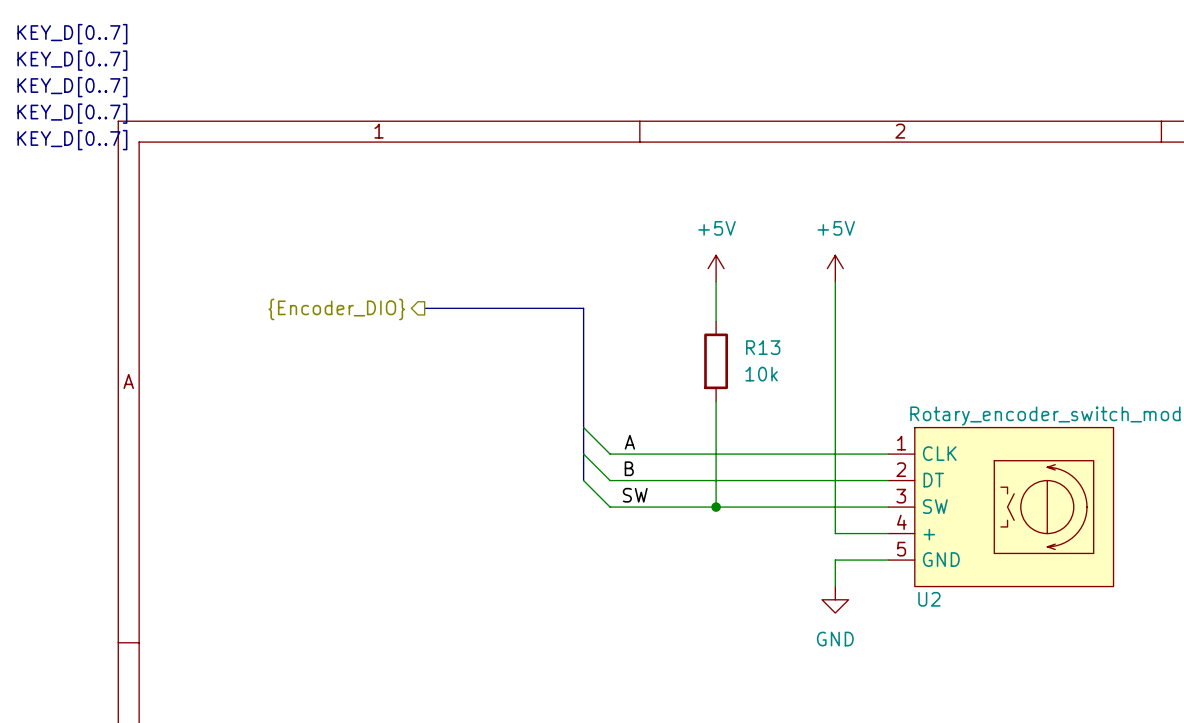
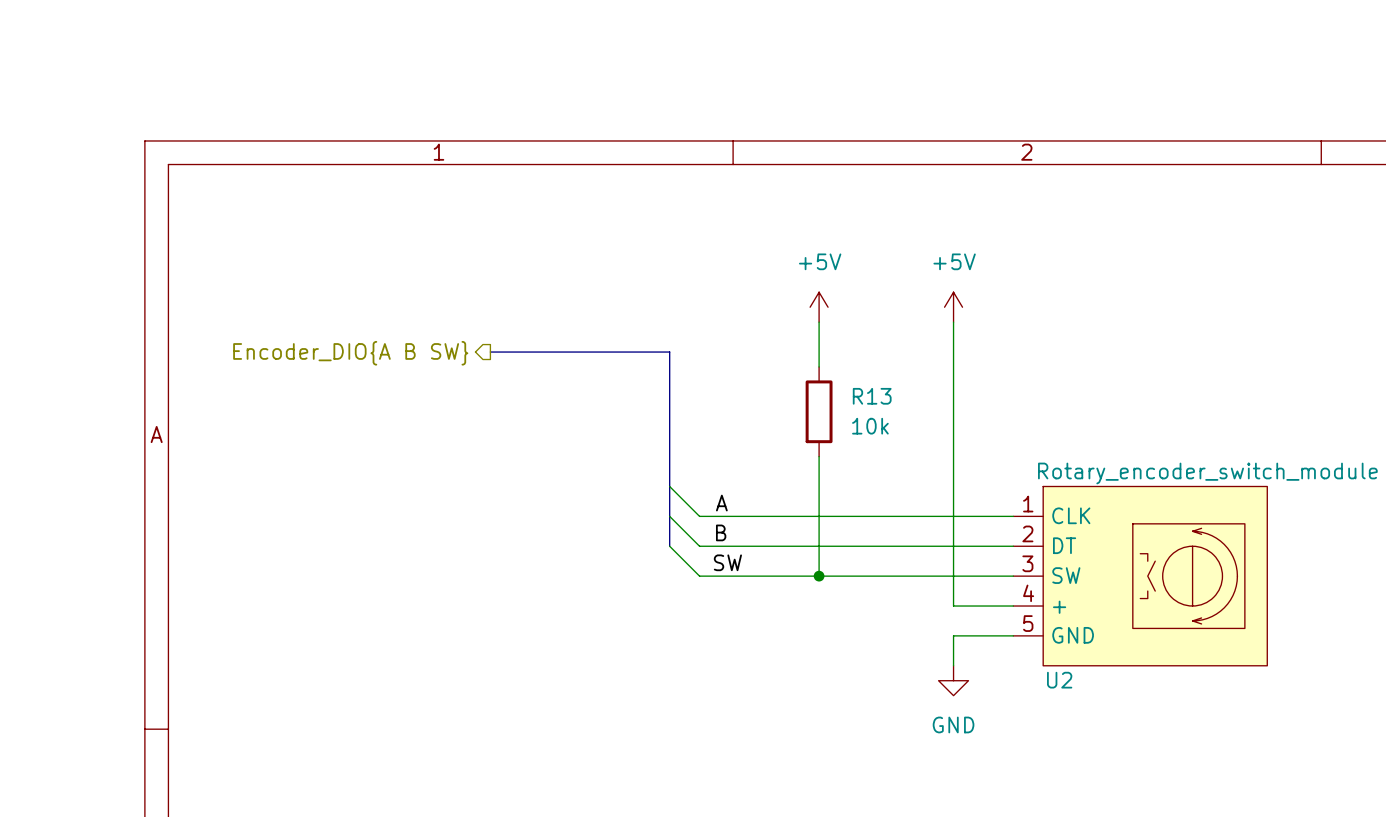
text: KEY_D[0..7] (72, 34) -> none
text: KEY_D[0..7] (72, 60) -> none
text: KEY_D[0..7] (72, 87) -> none
text: KEY_D[0..7] (72, 113) -> none
text: KEY_D[0..7] (72, 140) -> none
hierarchical label: {Encoder_DIO} (336, 309) -> Encoder_DIO{A B SW} (350, 353)

